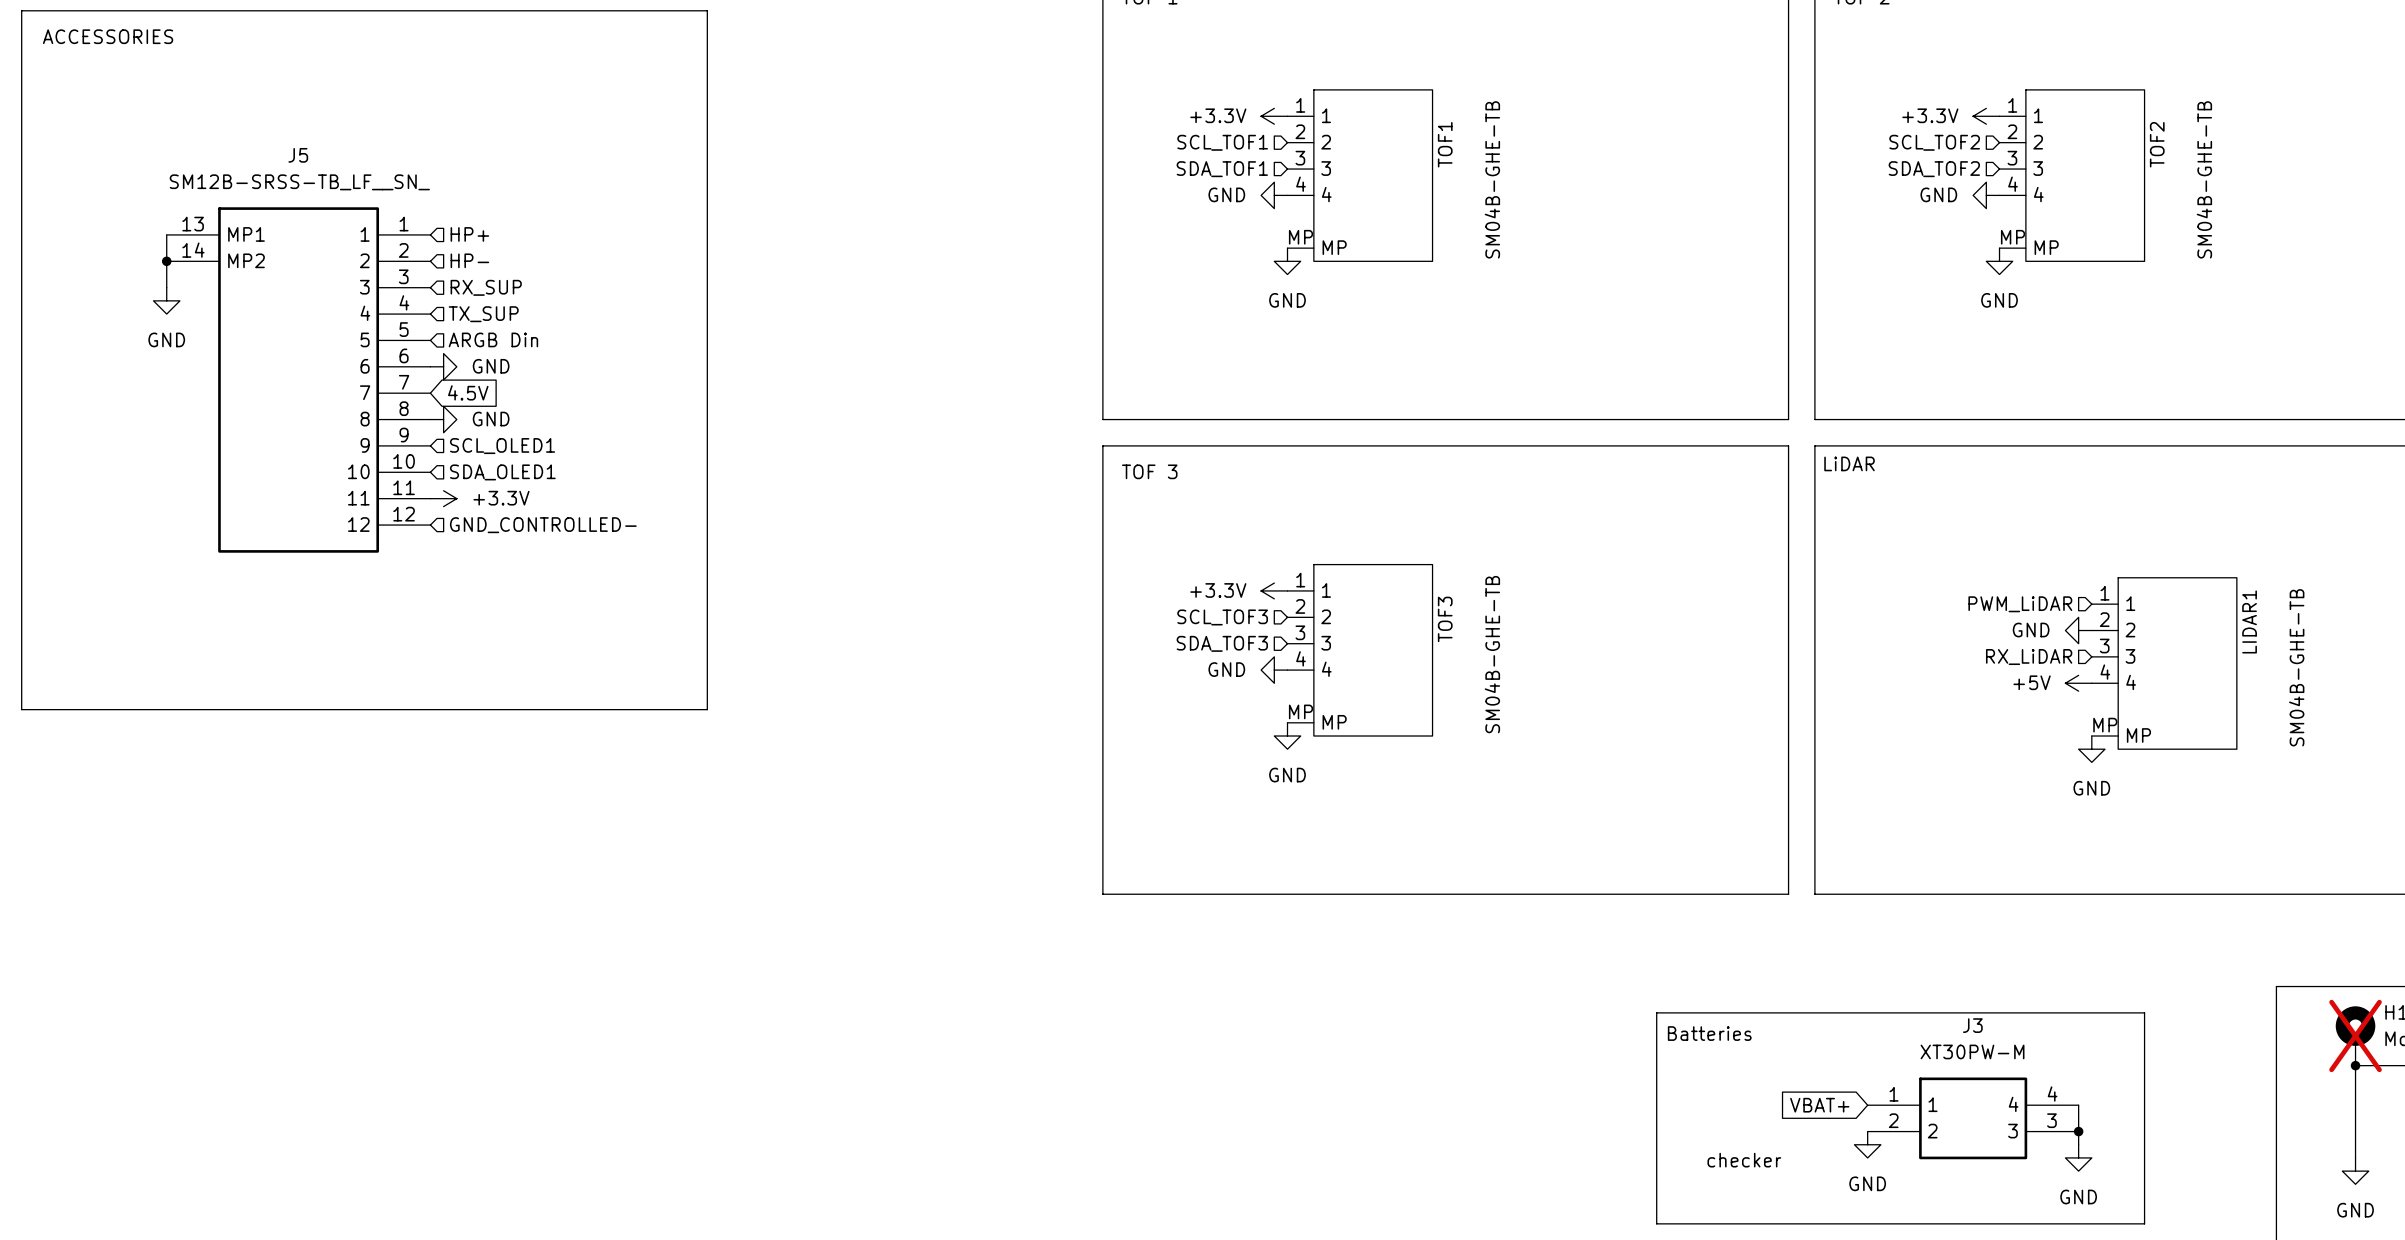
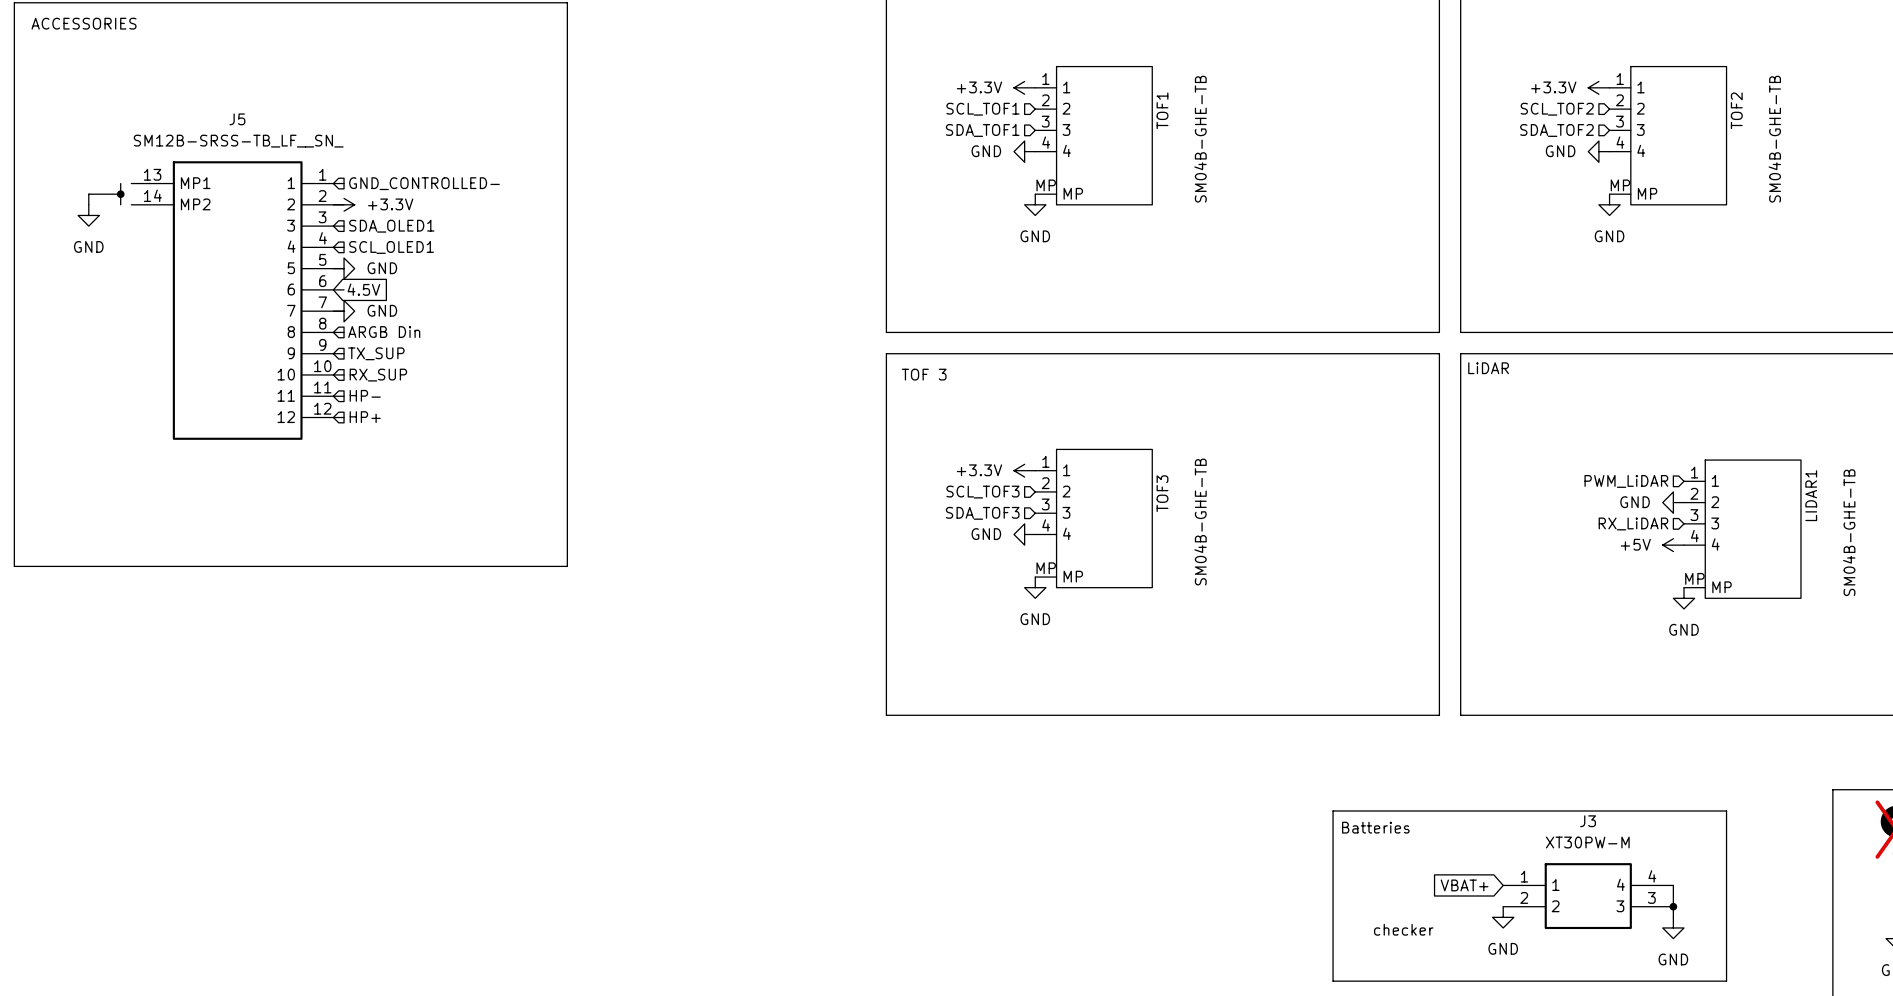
wire: none -> (120, 183) (120, 204)
wire: (166, 234) (166, 287) -> none
hierarchical label: HP+ (469, 234) -> none
hierarchical label: none -> GND_CONTROLLED- (424, 183)
wire: none -> (120, 194) (88, 194) (88, 204)
hierarchical label position: HP- (469, 260) -> HP- (365, 395)
junction position: (166, 261) -> (120, 194)
hierarchical label position: RX_SUP (486, 287) -> RX_SUP (378, 375)
power symbol position: GND (166, 300) -> GND (88, 215)
hierarchical label position: TX_SUP (483, 314) -> TX_SUP (376, 353)
hierarchical label position: ARGB Din (493, 339) -> ARGB Din (384, 332)
power symbol: none -> GND (344, 268)
power symbol: GND (443, 366) -> none
global label position: 4.5V (468, 392) -> 4.5V (363, 289)
power symbol: none -> GND (344, 311)
power symbol: GND (443, 419) -> none
hierarchical label position: SCL_OLED1 (502, 446) -> SCL_OLED1 (391, 247)
hierarchical label position: SDA_OLED1 (502, 472) -> SDA_OLED1 (391, 226)
power symbol position: +3.3V (443, 498) -> +3.3V (344, 204)
hierarchical label: none -> HP+ (365, 417)
hierarchical label: GND_CONTROLLED- (543, 525) -> none

